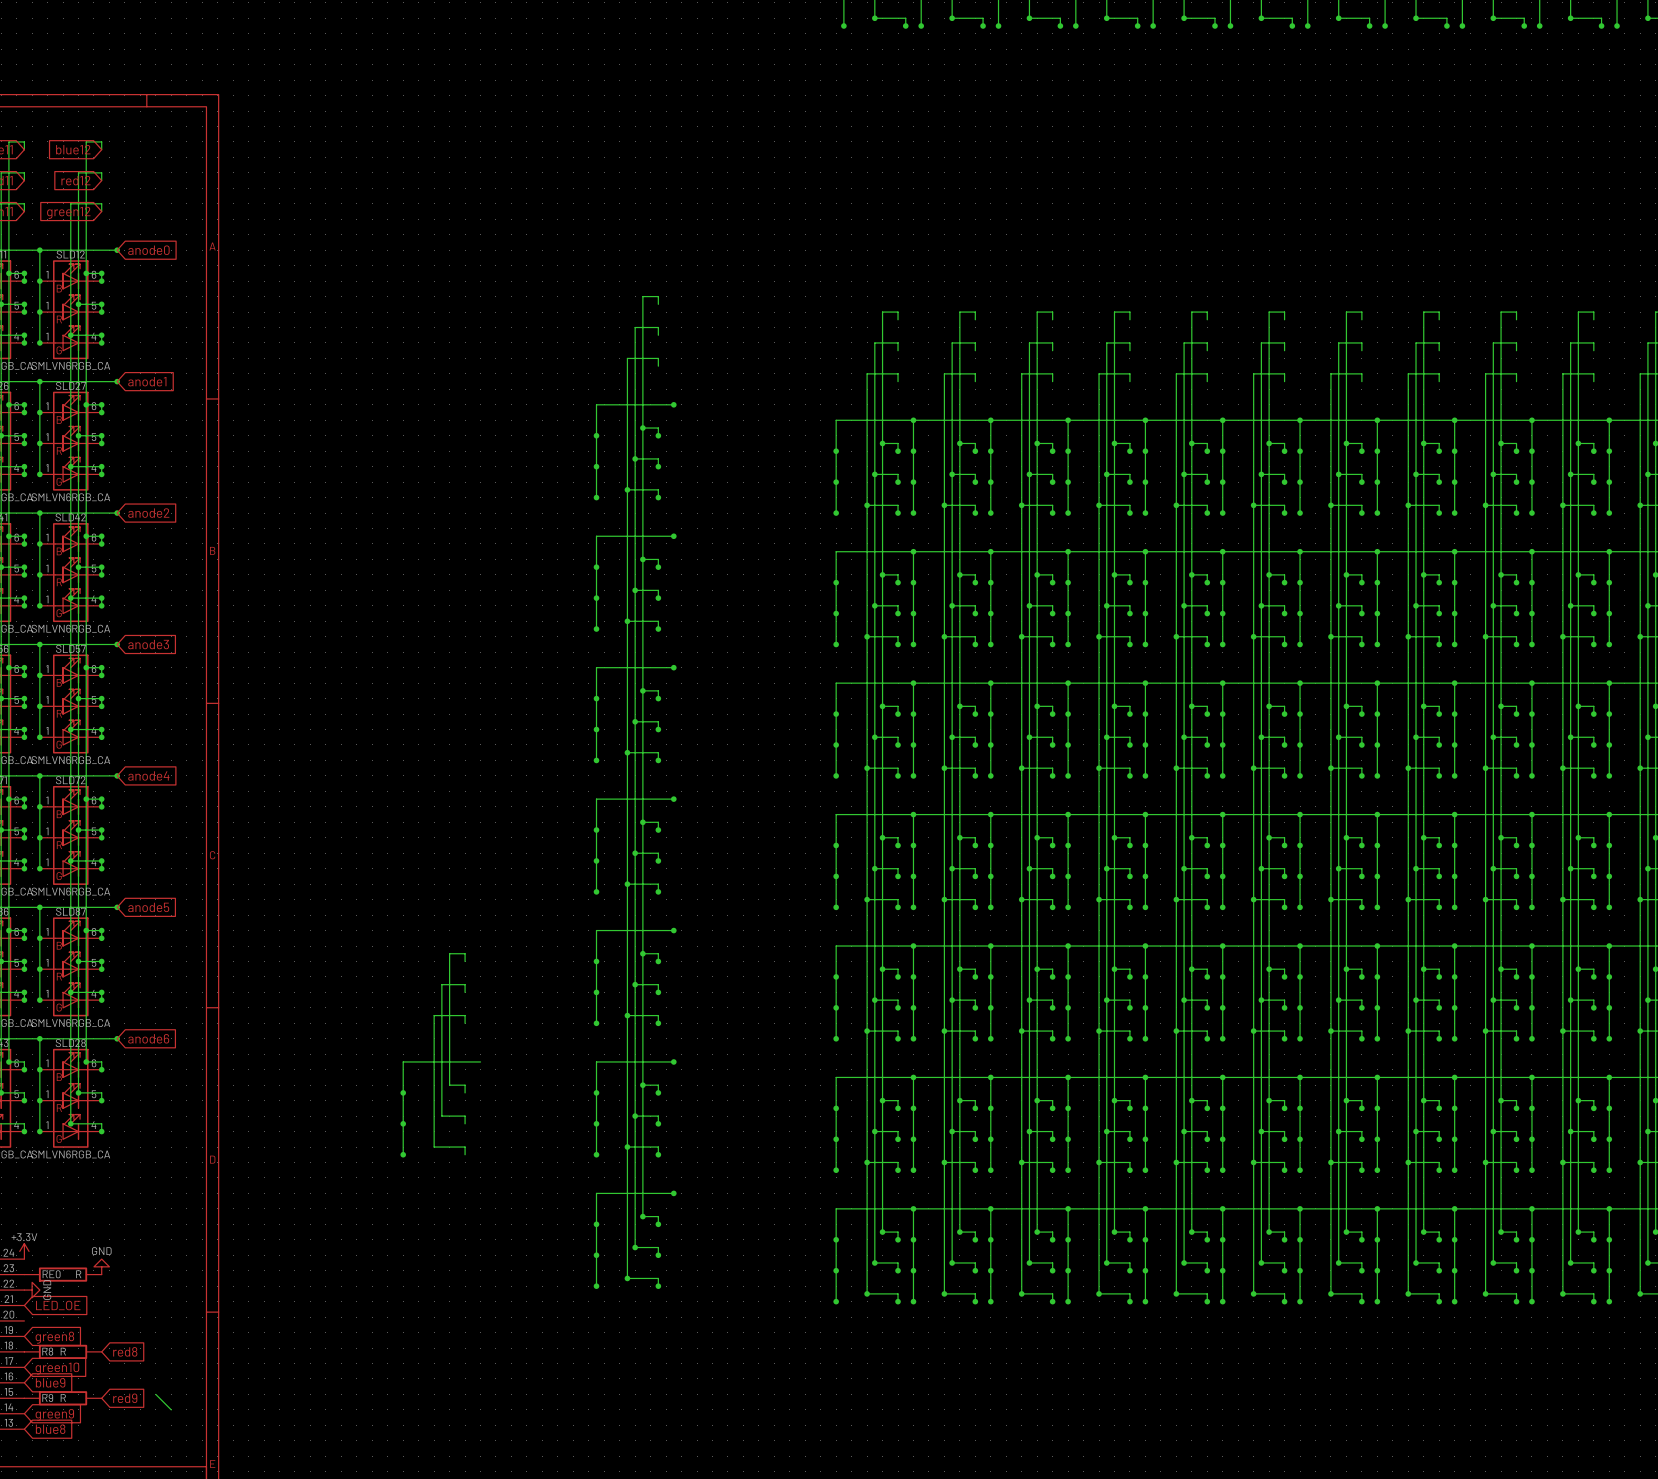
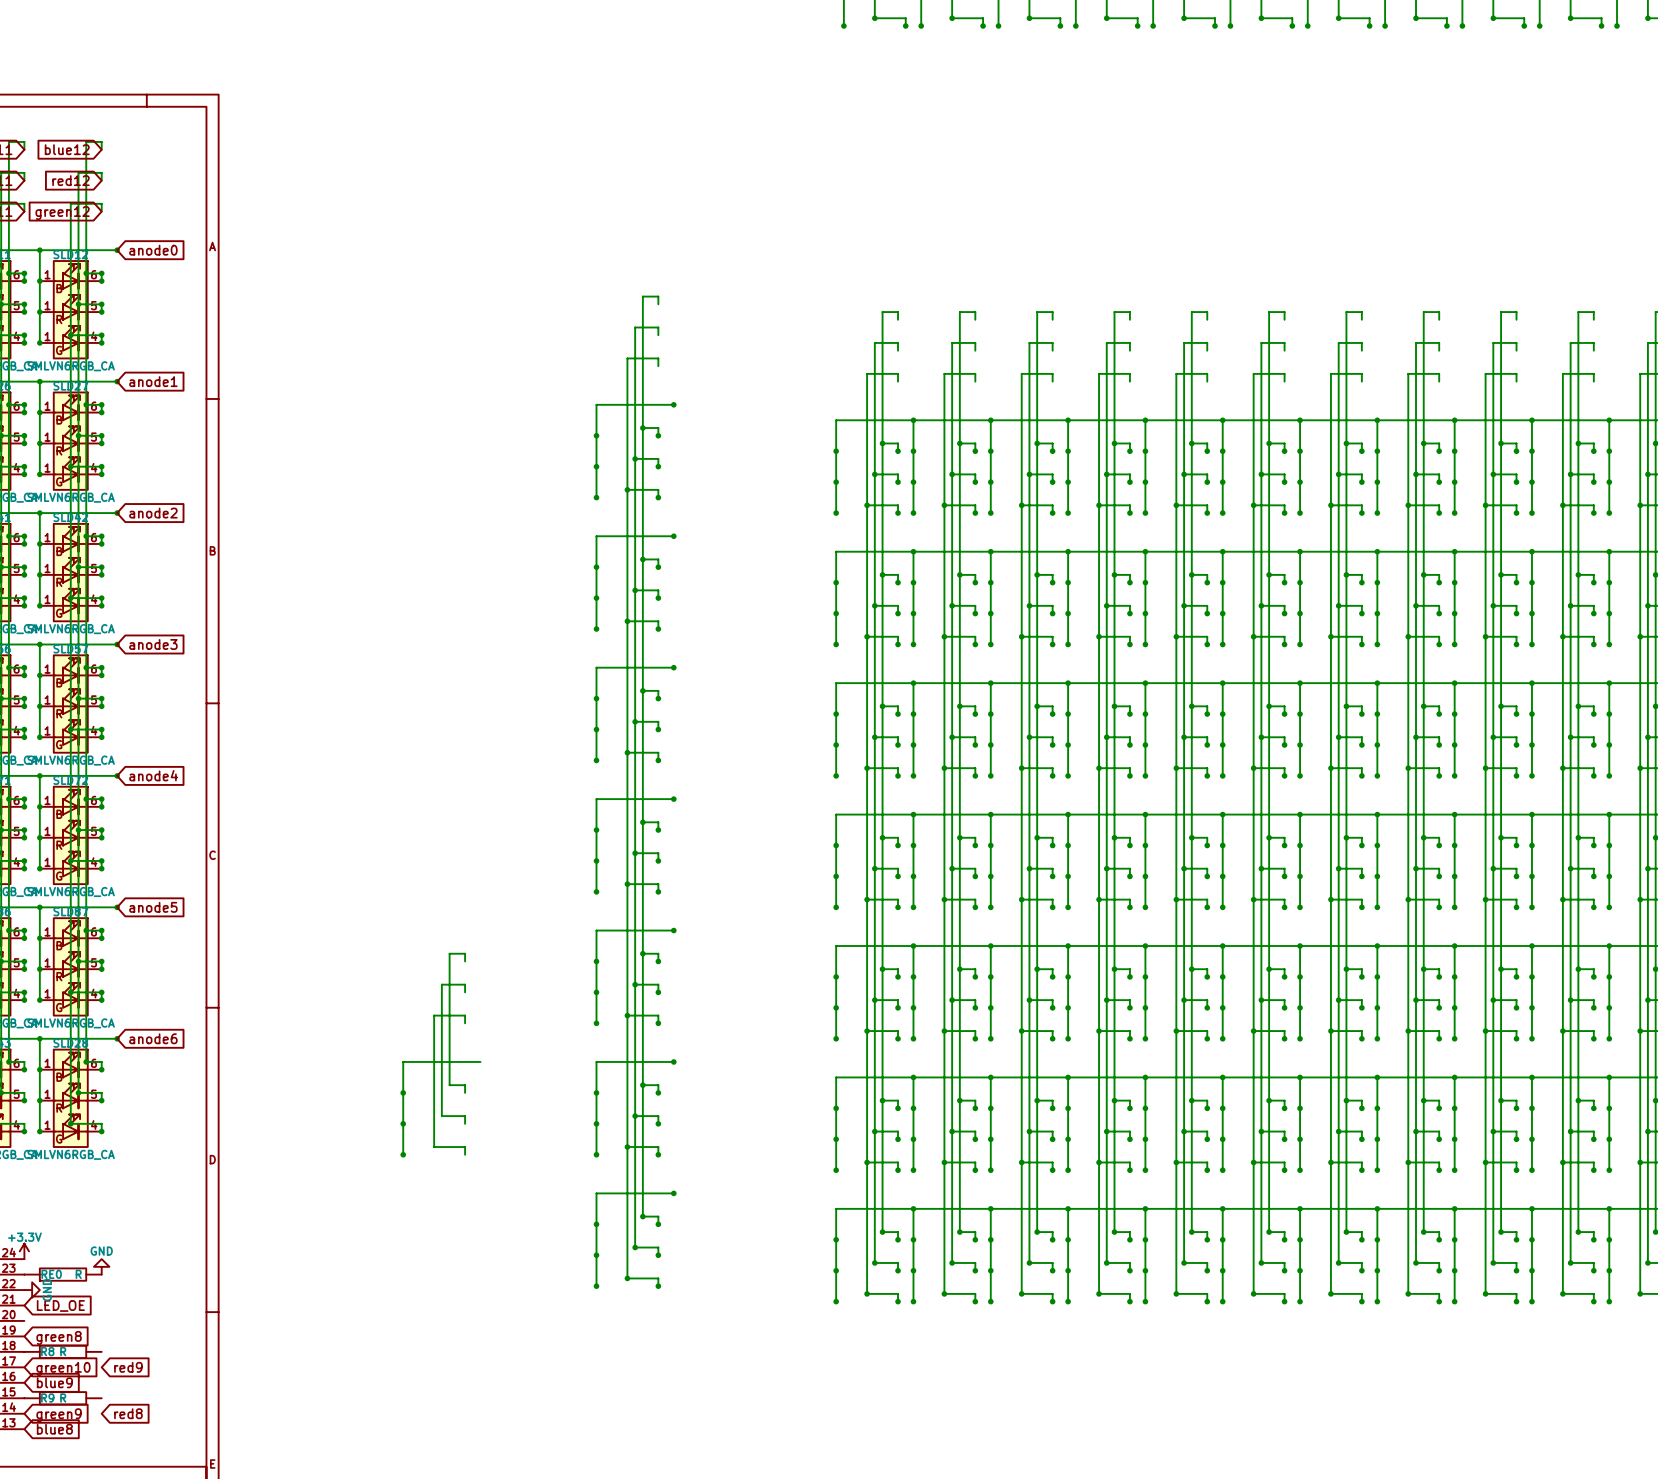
global label position: red8 (125, 1351) -> red8 (128, 1413)
wire: (155, 1394) (171, 1409) -> none
global label position: red9 (125, 1398) -> red9 (128, 1367)

